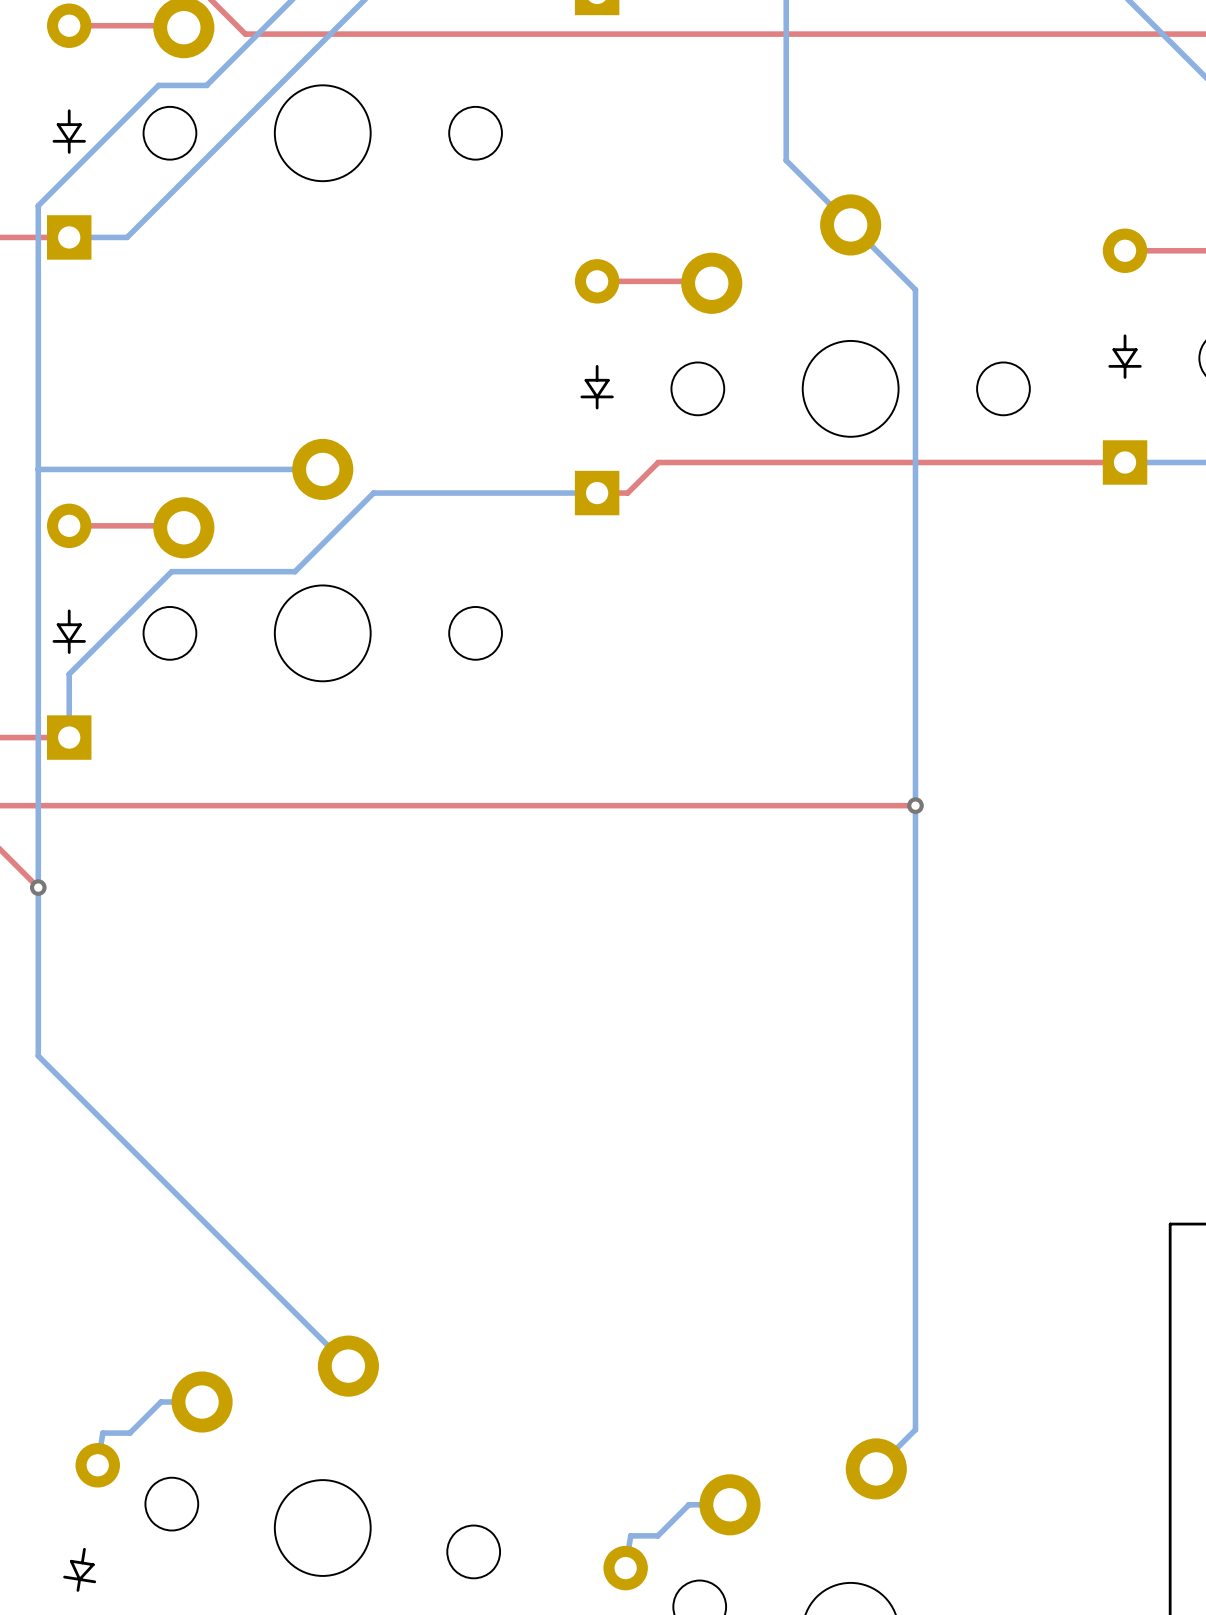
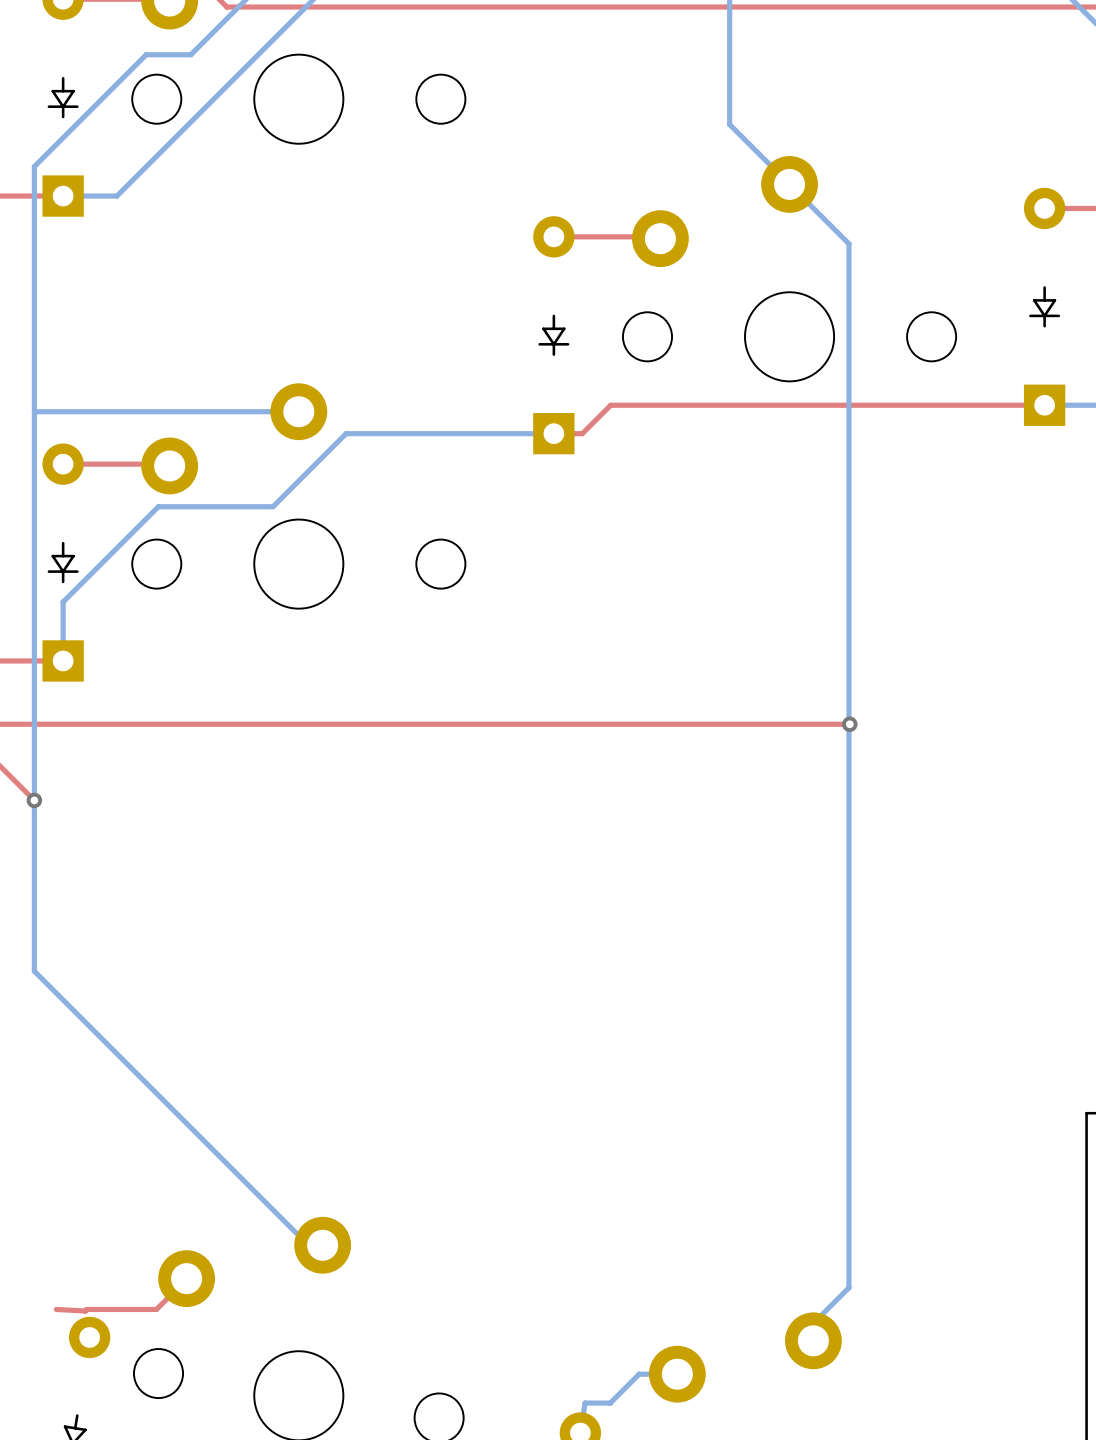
bottom track: (914, 288) (915, 1429) (876, 1468) -> (848, 243) (848, 1287) (797, 1339)
bottom track: (38, 1056) (348, 1366) -> (34, 956) (34, 971) (306, 1243)
bottom track: (202, 1402) (161, 1402) (129, 1433) (102, 1433) (97, 1465) -> none
top track: none -> (174, 1291) (156, 1309) (85, 1310) (56, 1309)

